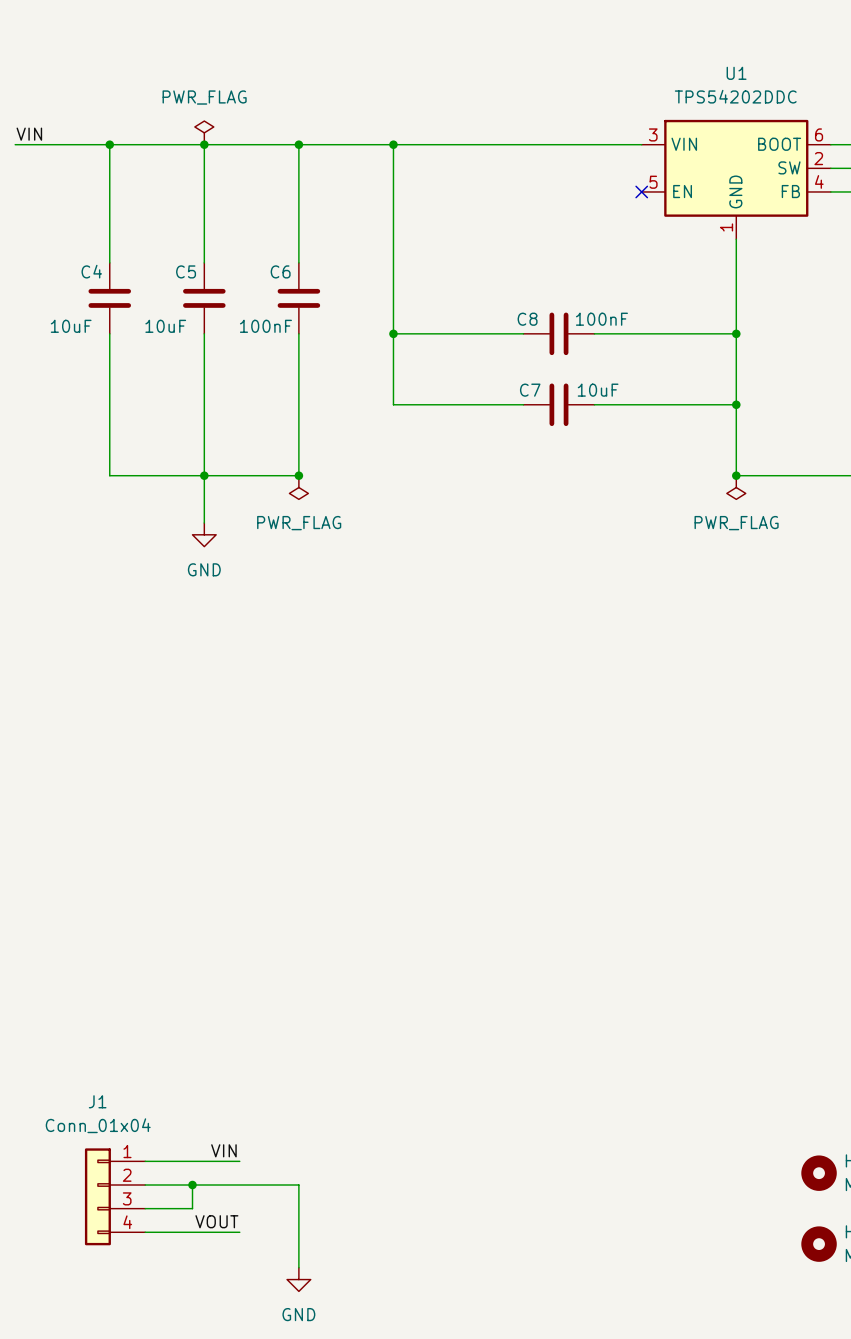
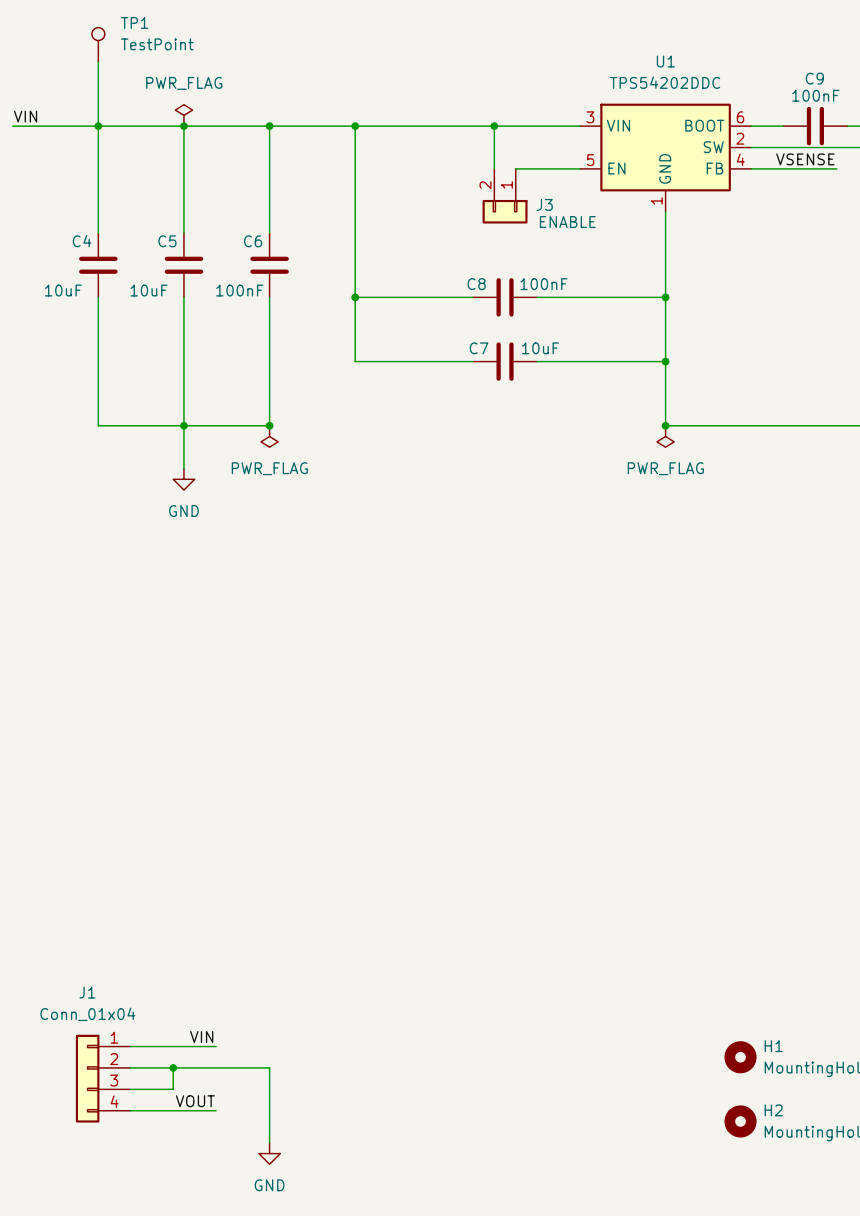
TP1: none -> TestPoint (98, 44)
wire: none -> (98, 61) (98, 126)
wire: none -> (494, 126) (494, 168)
junction: none -> (494, 126)
wire: none -> (515, 168) (579, 168)
no-connect mark: (641, 191) -> none
J3: none -> ENABLE (505, 196)

